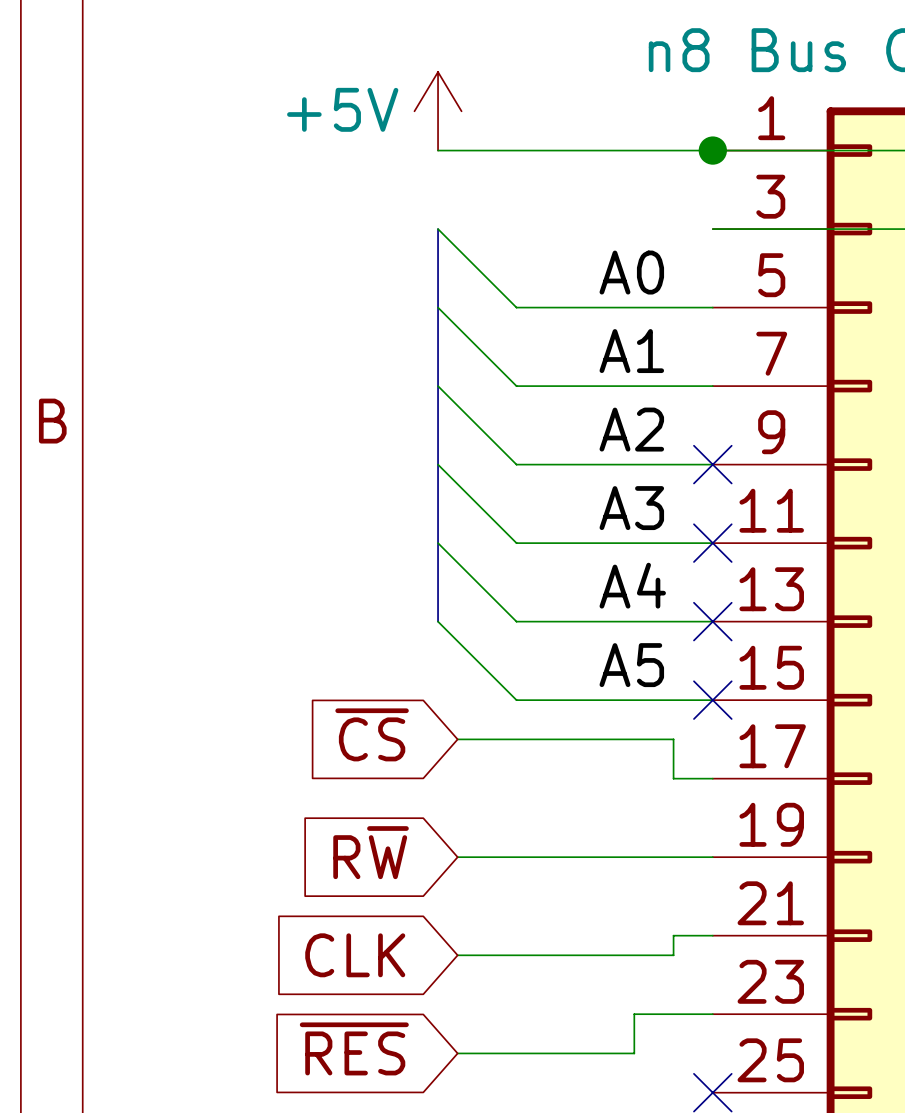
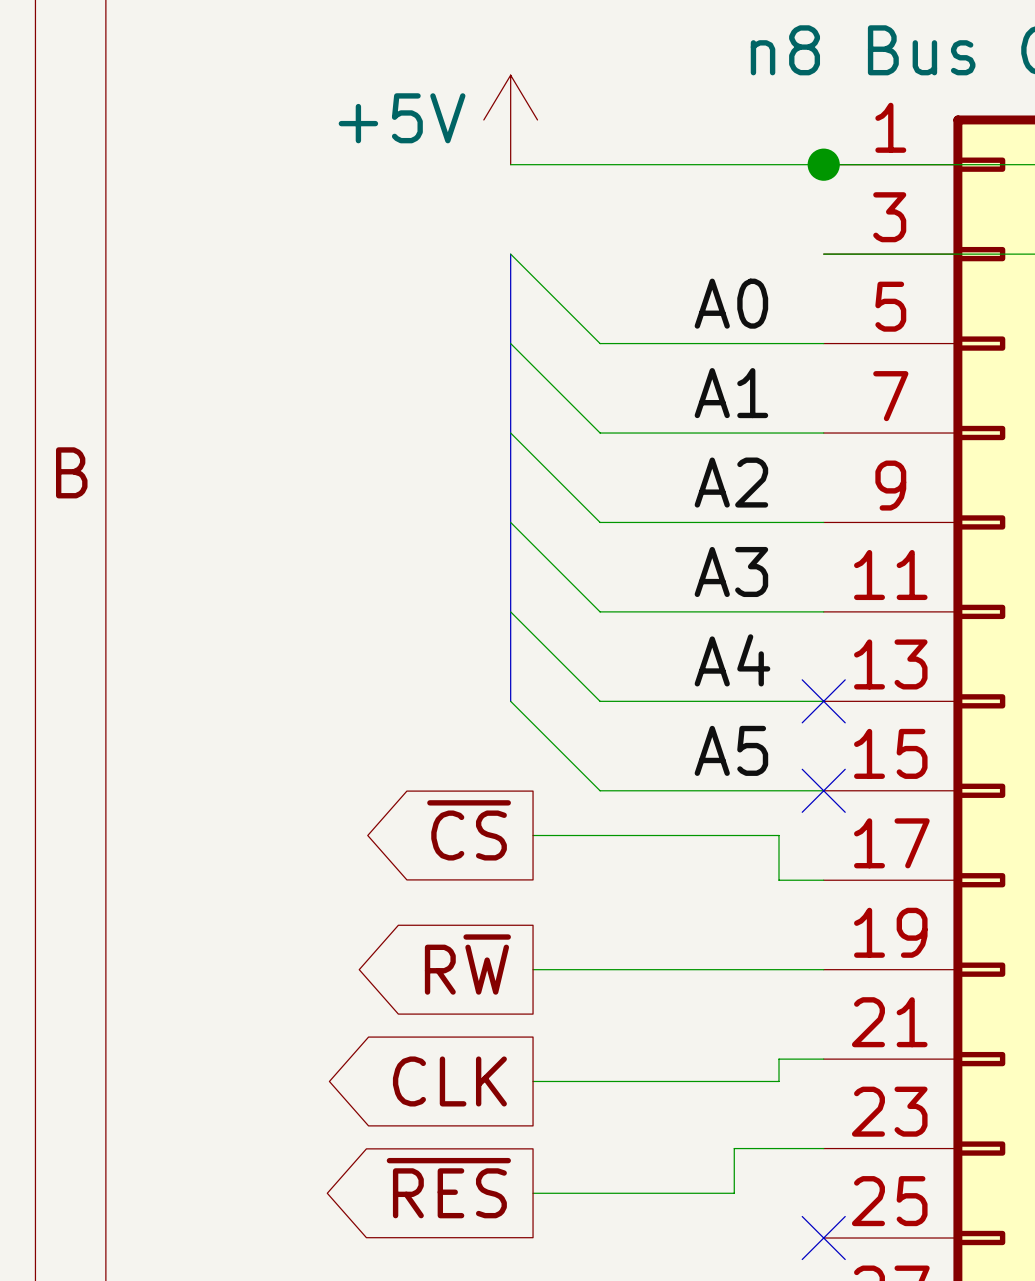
no-connect mark: (712, 464) -> none
no-connect mark: (712, 543) -> none
global label shape: input (372, 734) -> output (469, 830)
global label shape: input (371, 852) -> output (467, 964)
global label shape: input (355, 955) -> output (449, 1081)
global label shape: input (354, 1048) -> output (448, 1188)

